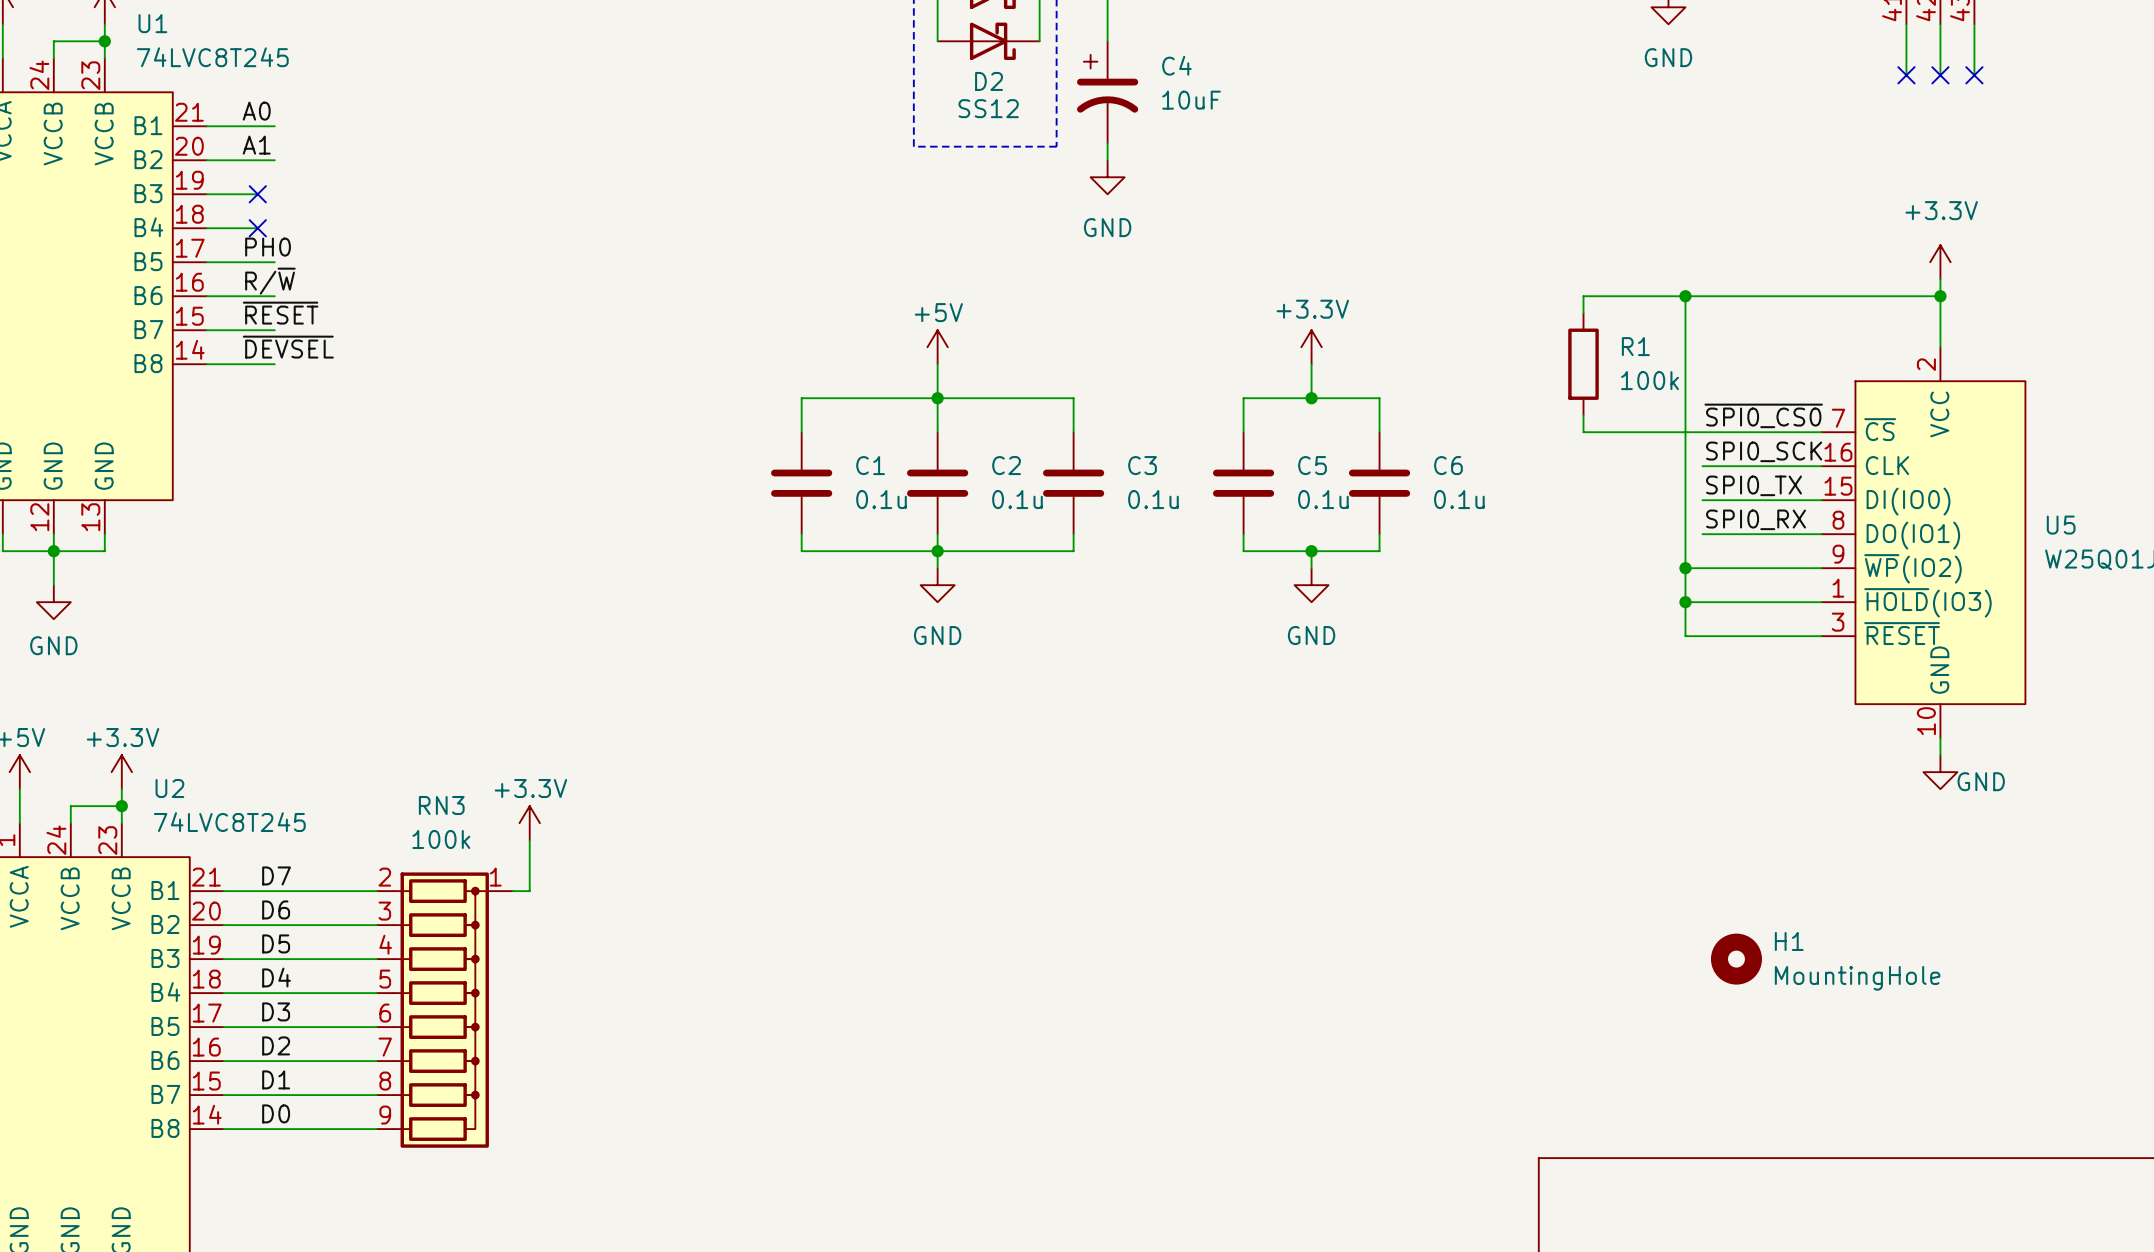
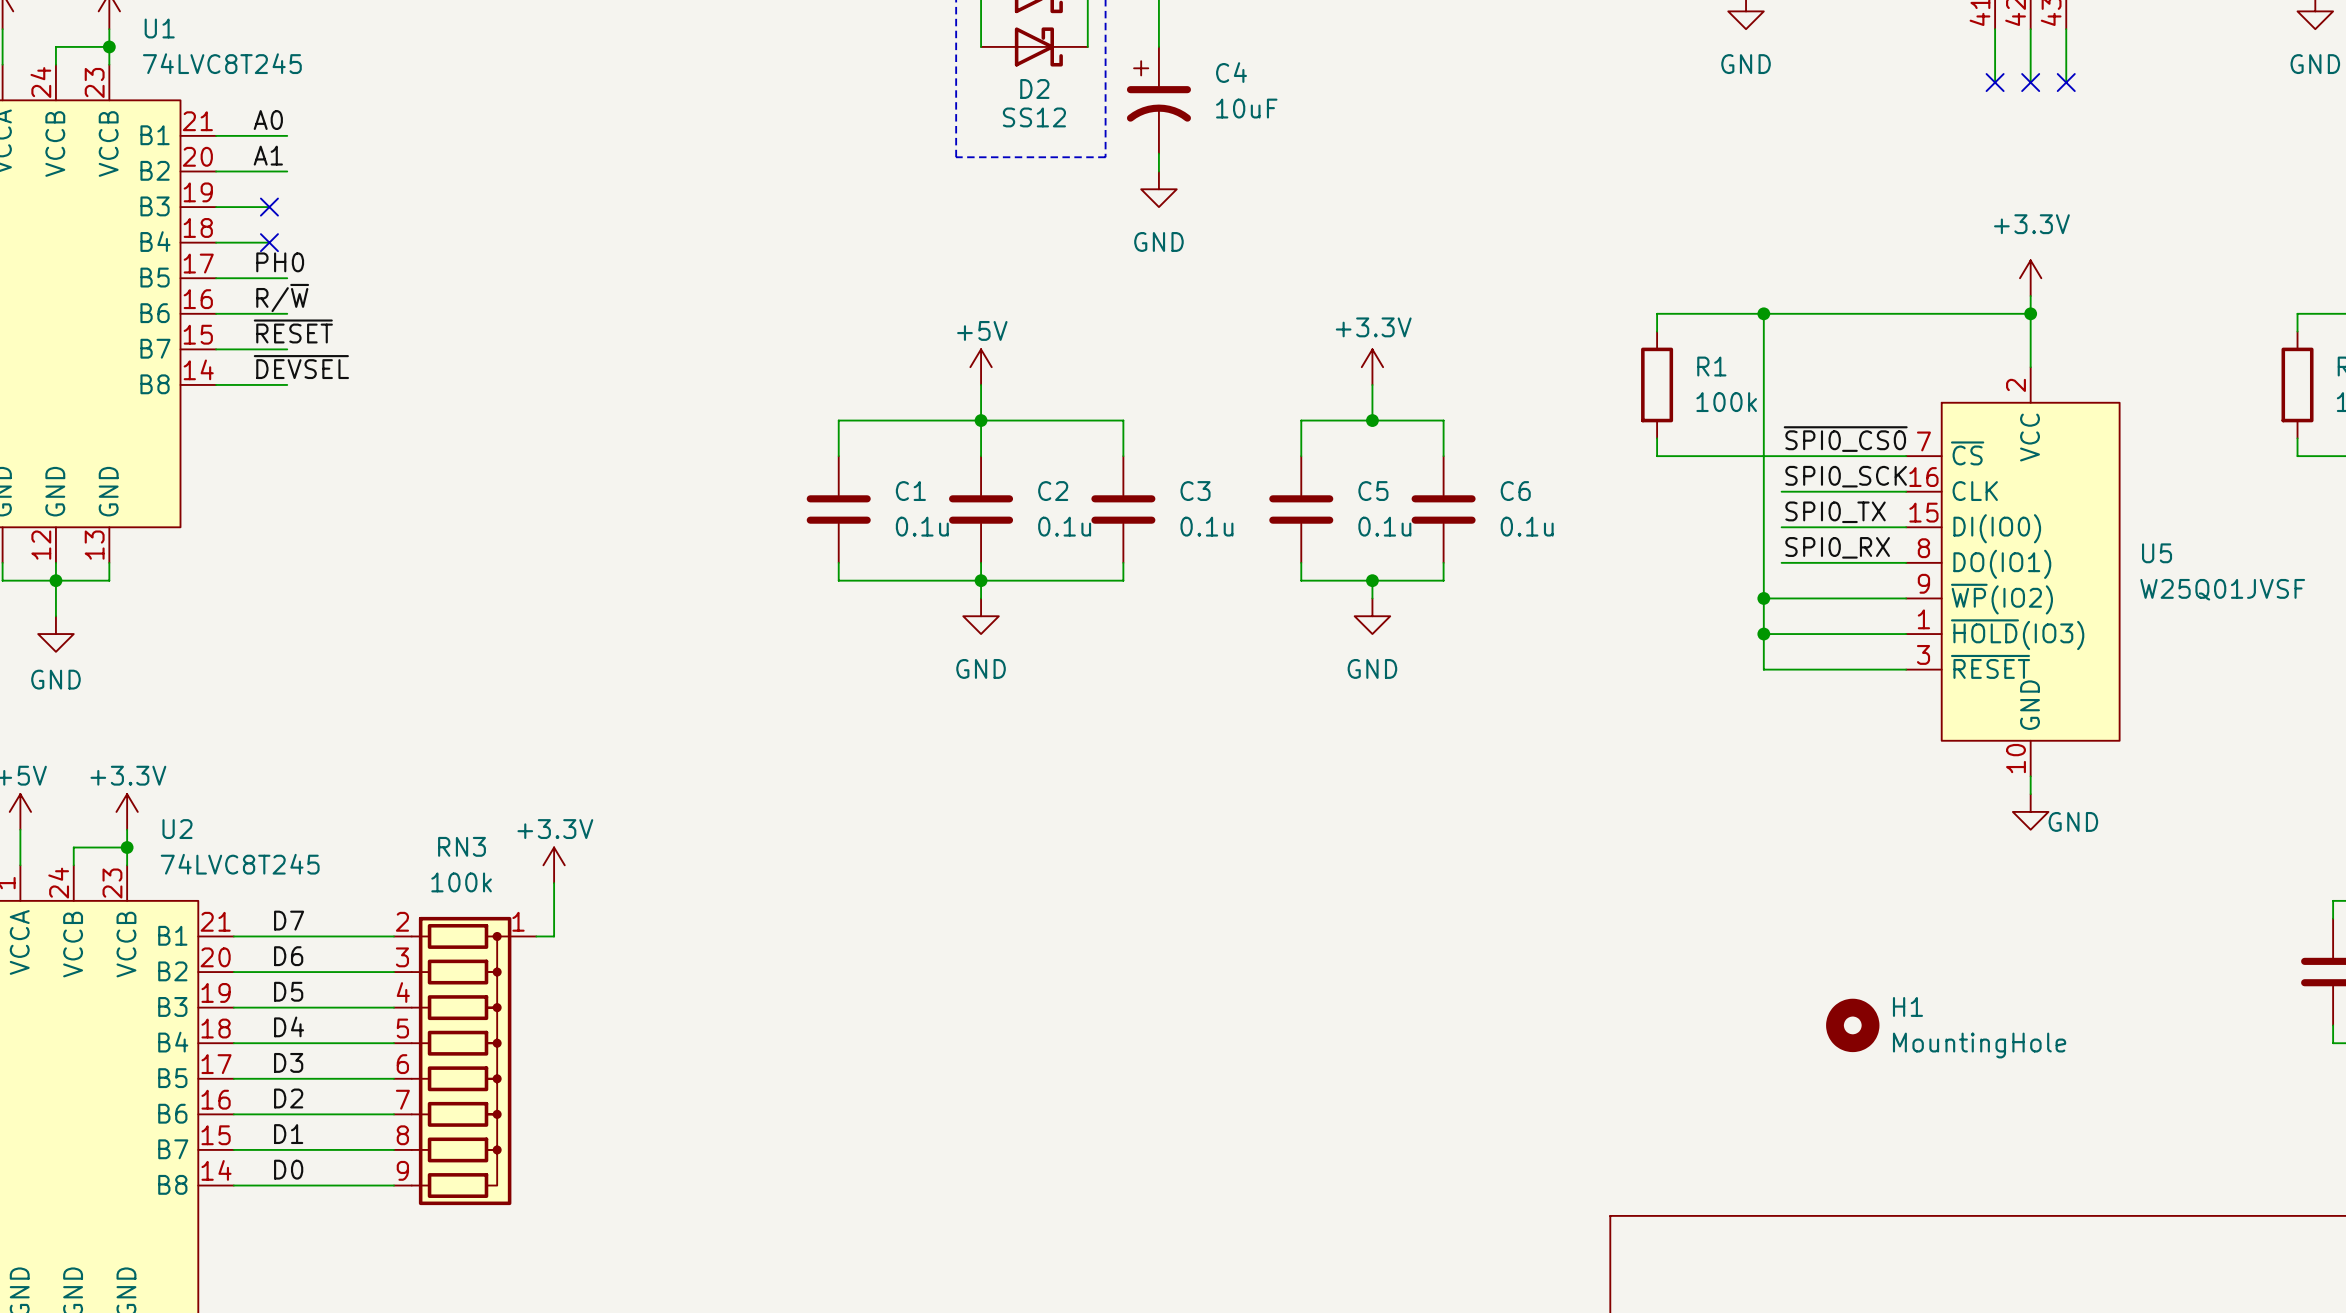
H1 position: (1736, 959) -> (1852, 1025)

